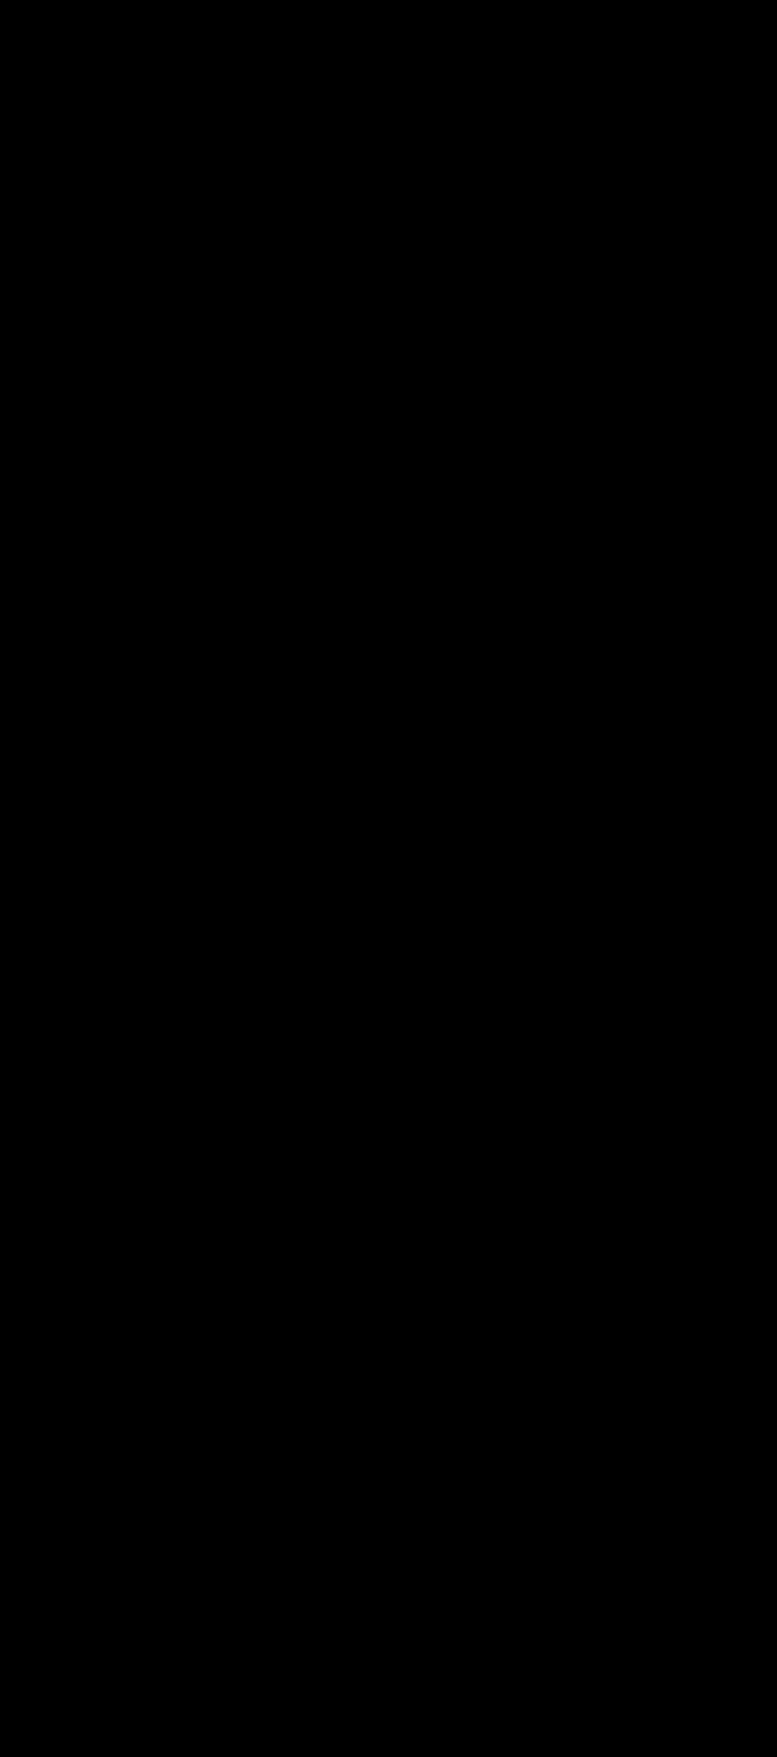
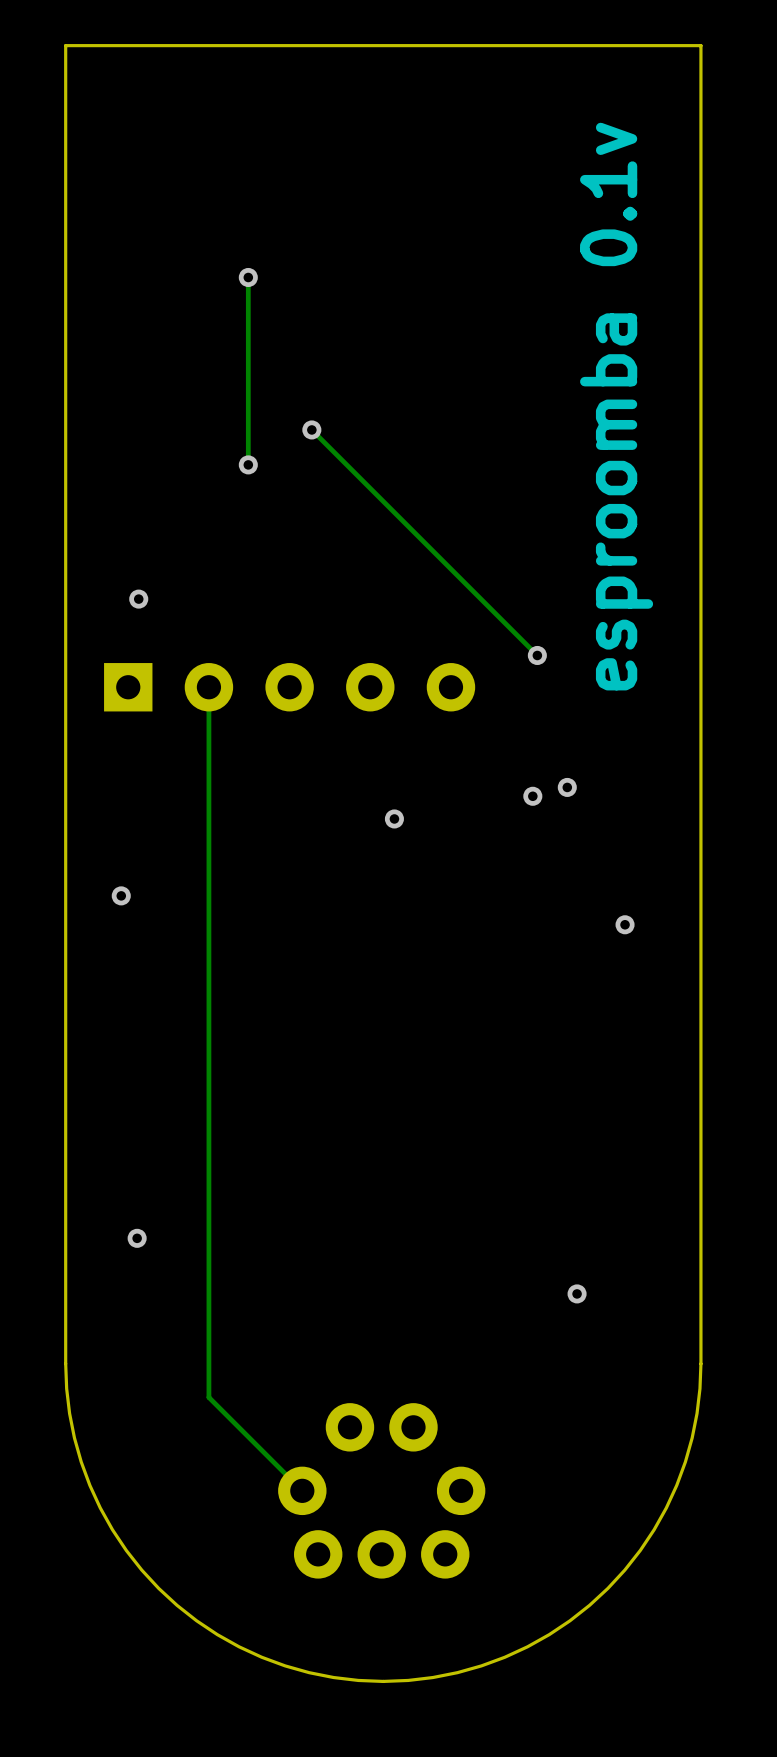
board edge: none -> (700, 45) (700, 1363) (699, 1388) (692, 1437) (676, 1485) (654, 1529) (640, 1550) (607, 1588) (589, 1605) (549, 1634) (504, 1657) (481, 1665) (433, 1677) (408, 1680) (358, 1680) (309, 1672) (261, 1657) (239, 1646) (196, 1620) (158, 1588) (126, 1550) (100, 1508) (81, 1461) (69, 1413) (65, 1363) (65, 45) (700, 45)
track: none -> (248, 277) (248, 464)
via: none -> (248, 277)
text: none -> esproomba 0.1v (616, 406)
track: none -> (311, 429) (537, 655)
via: none -> (311, 429)
via: none -> (248, 464)
via: none -> (138, 599)
via: none -> (537, 655)
track: none -> (208, 687) (208, 1397) (302, 1490)
part: none -> (289, 687)
via: none -> (567, 787)
via: none -> (532, 796)
via: none -> (394, 818)
via: none -> (121, 895)
via: none -> (625, 924)
via: none -> (137, 1238)
via: none -> (577, 1293)
part: none -> (381, 1490)

